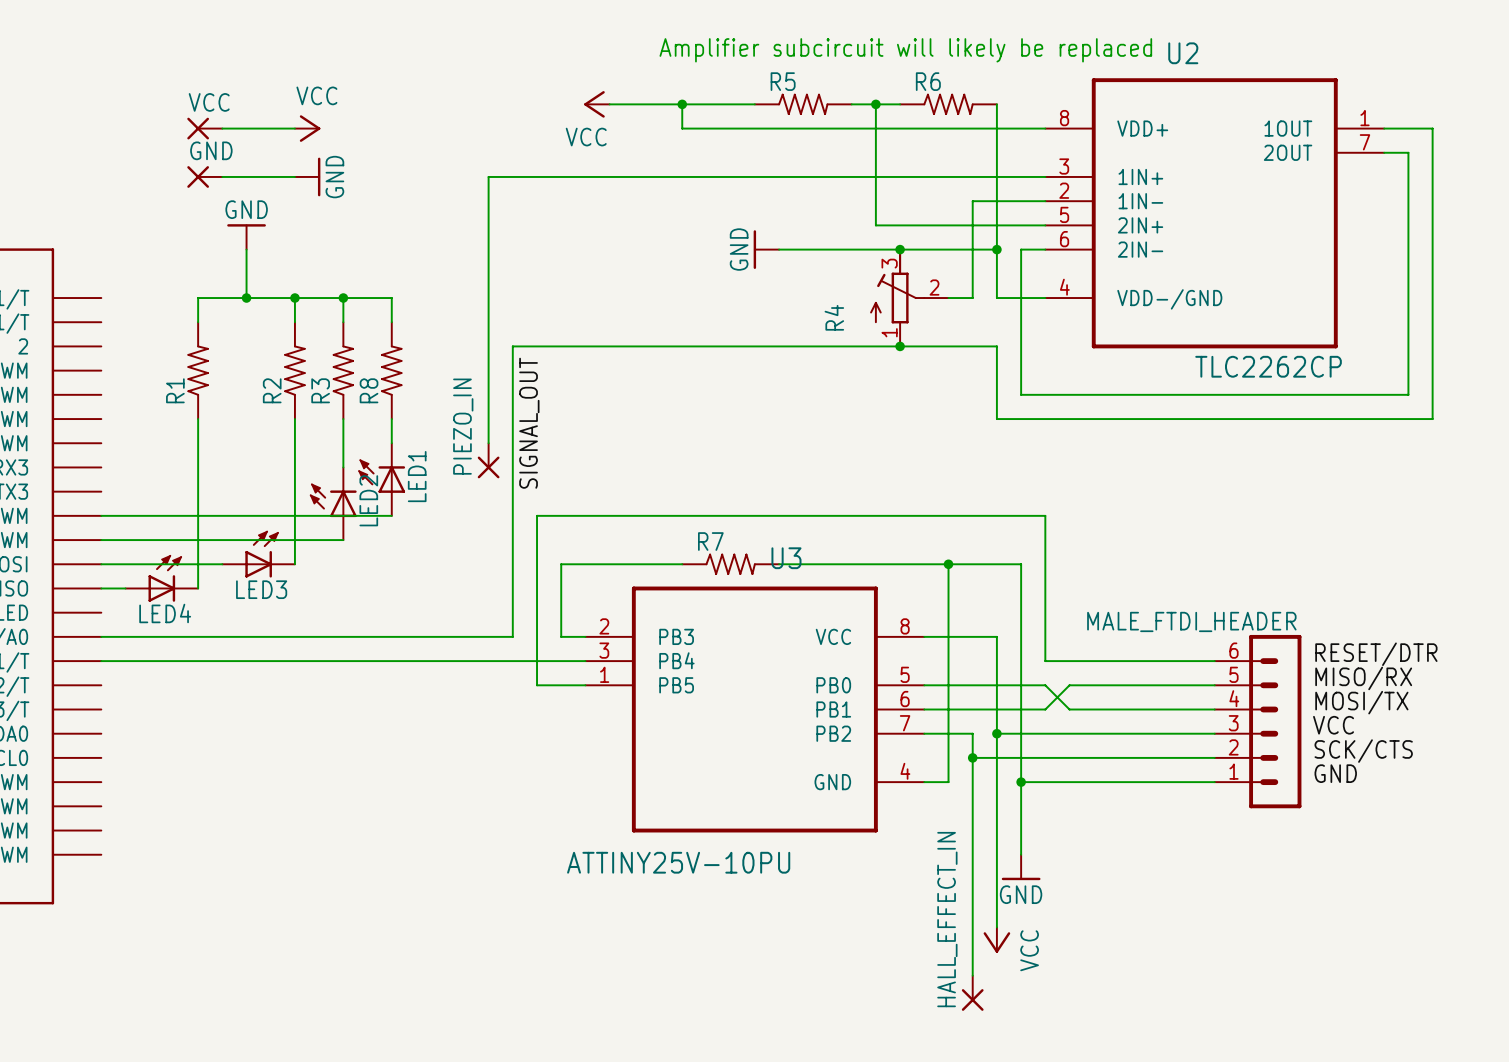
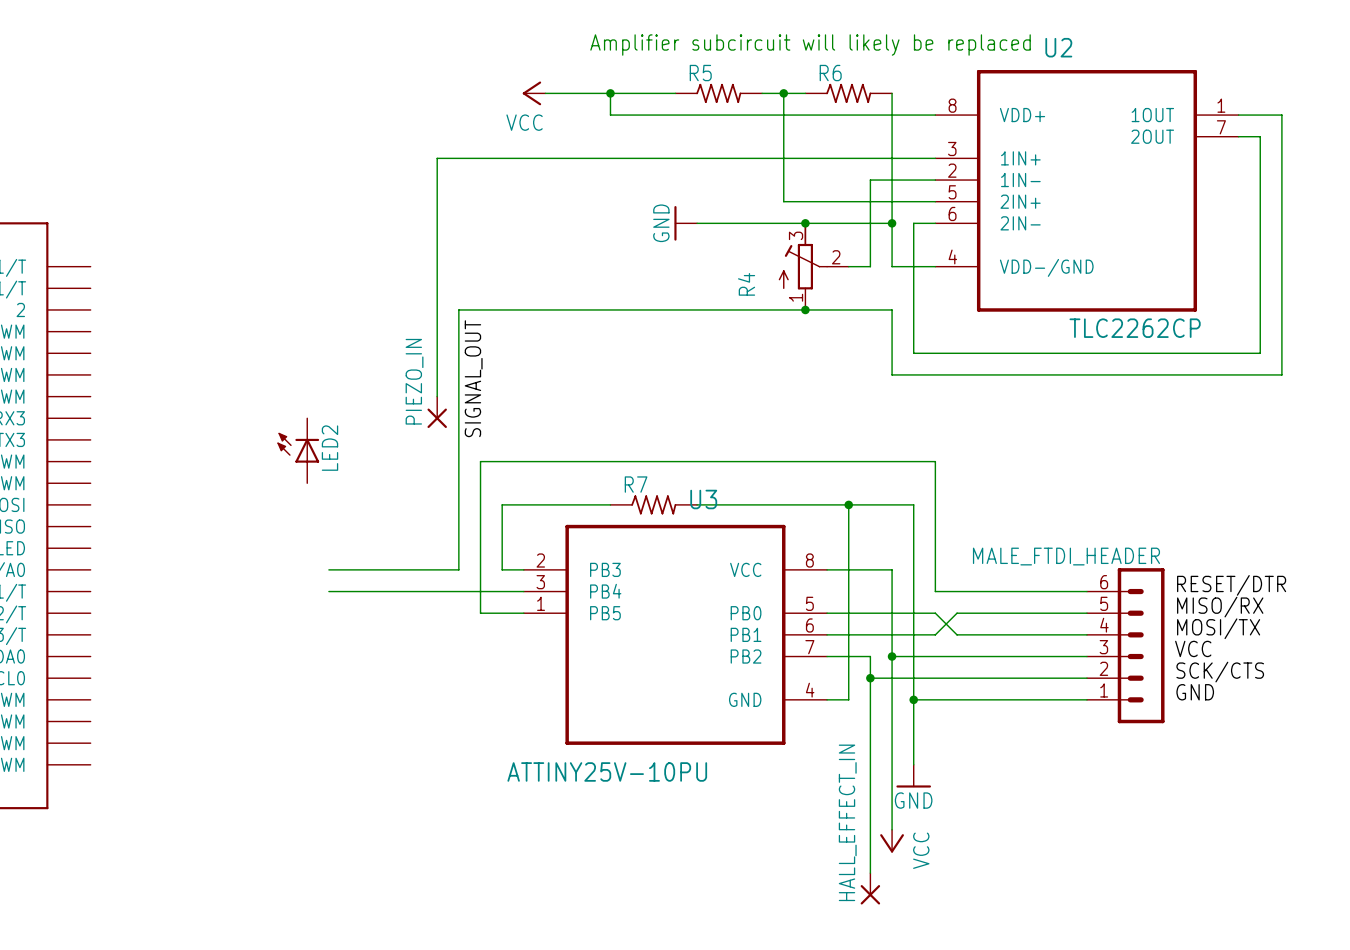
VCC: (204, 128) -> none
wire: (222, 128) (294, 128) -> none
power symbol: VCC (307, 128) -> none
GND: (204, 176) -> none
wire: (222, 176) (294, 176) -> none
power symbol: GND (307, 176) -> none
power symbol: GND (246, 236) -> none
wire: (246, 249) (246, 298) -> none
junction: (246, 298) -> none
wire: (294, 298) (294, 322) -> none
junction: (294, 298) -> none
wire: (343, 298) (343, 322) -> none
junction: (343, 298) -> none
wire: (198, 322) (198, 298) (391, 298) (391, 322) -> none
R1: (198, 370) -> none
R2: (294, 370) -> none
R3: (343, 370) -> none
R8: (391, 370) -> none
wire: (198, 419) (198, 588) -> none
wire: (294, 419) (294, 564) -> none
wire: (343, 419) (343, 467) -> none
wire: (391, 419) (391, 443) -> none
LED1: (381, 479) -> none
wire: (101, 515) (391, 515) -> none
wire: (101, 540) (343, 540) -> none
LED3: (258, 554) -> none
wire: (101, 564) (222, 564) -> none
LED4: (161, 578) -> none
wire: (101, 588) (125, 588) -> none
wire: (101, 636) (367, 636) -> none
wire: (101, 661) (367, 661) -> none

